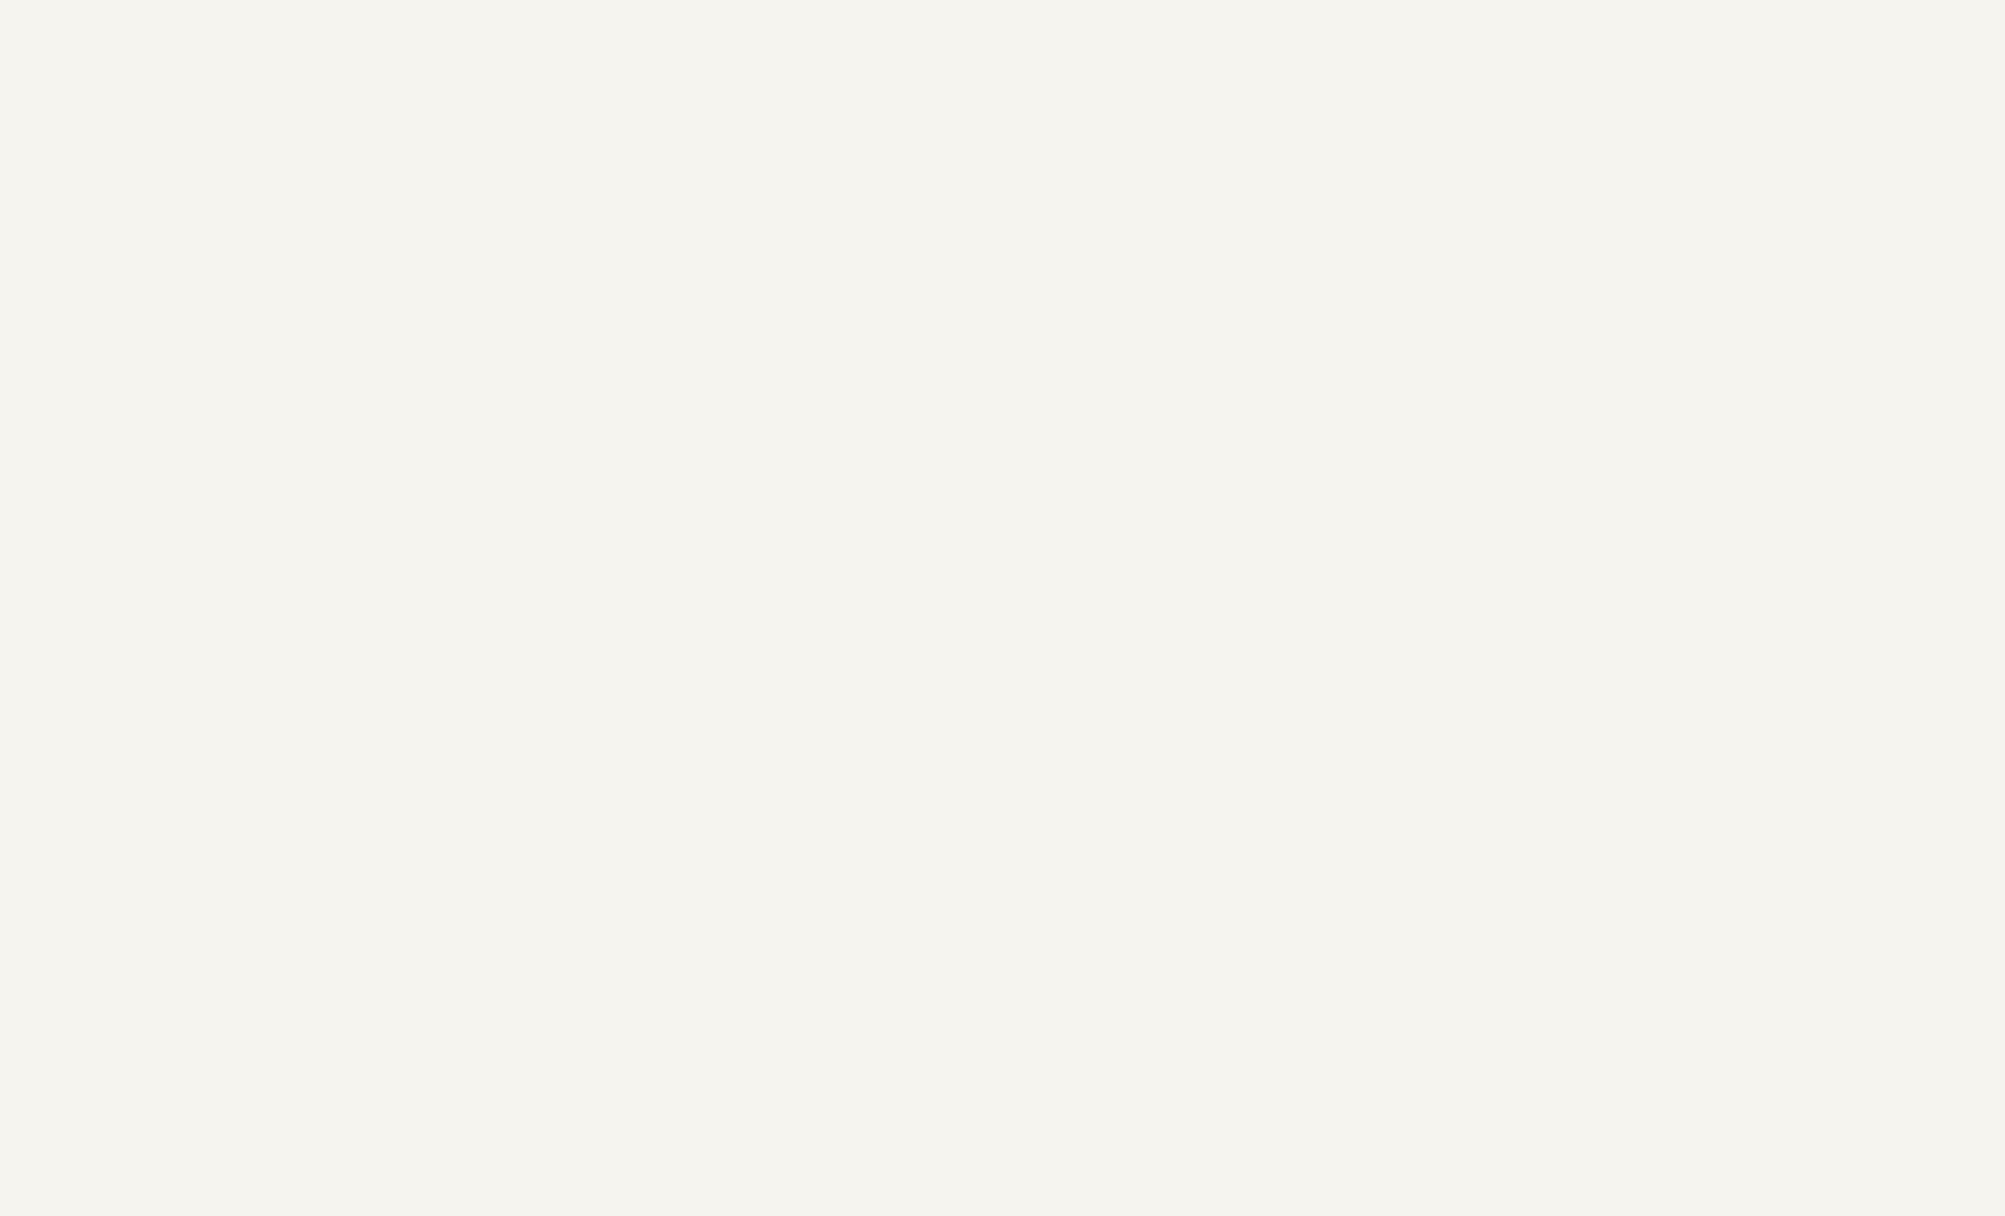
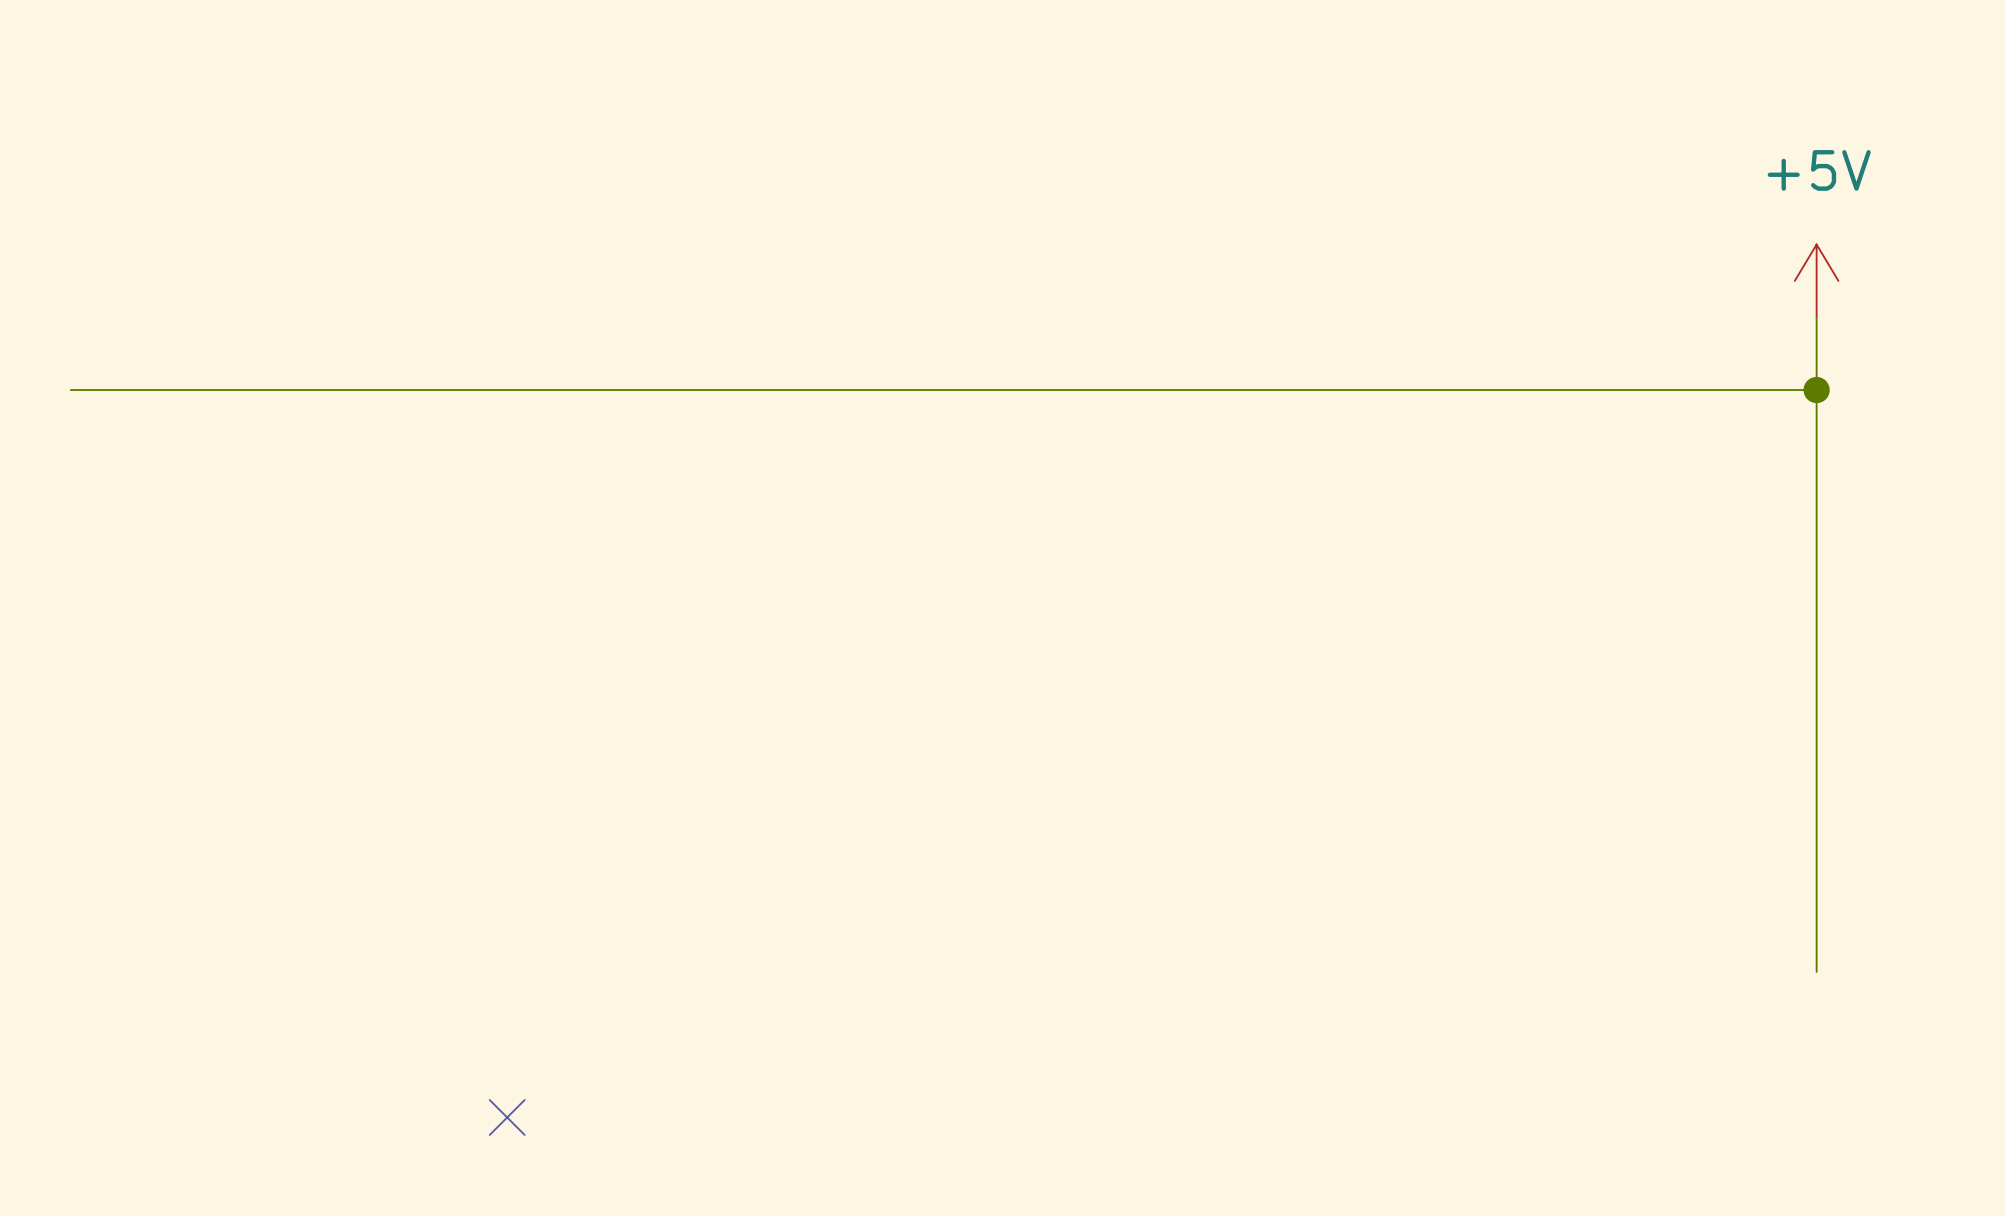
power symbol: none -> +5V (1816, 280)
wire: none -> (1816, 317) (1816, 971)
wire: none -> (70, 390) (1816, 390)
junction: none -> (1816, 390)
no-connect mark: none -> (507, 1117)

